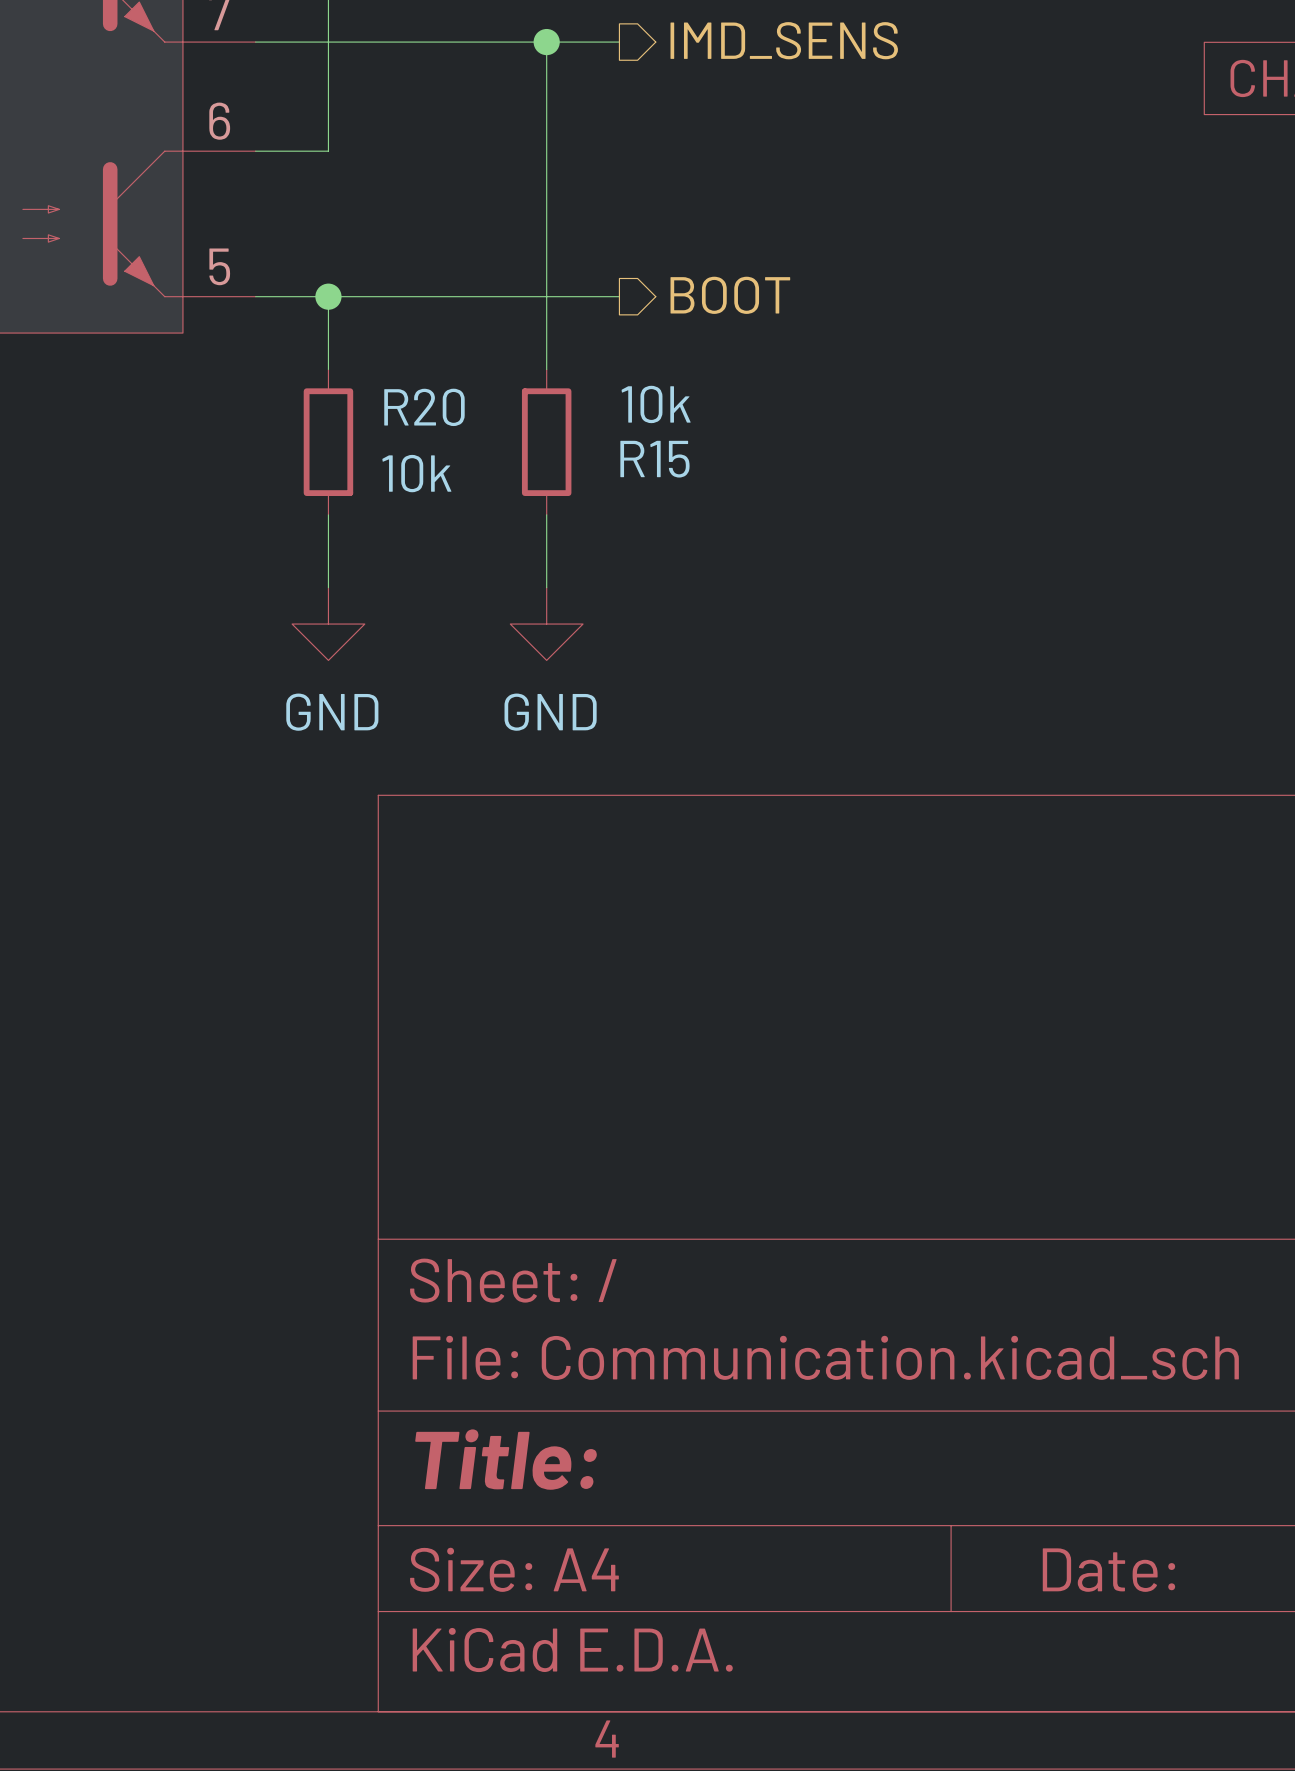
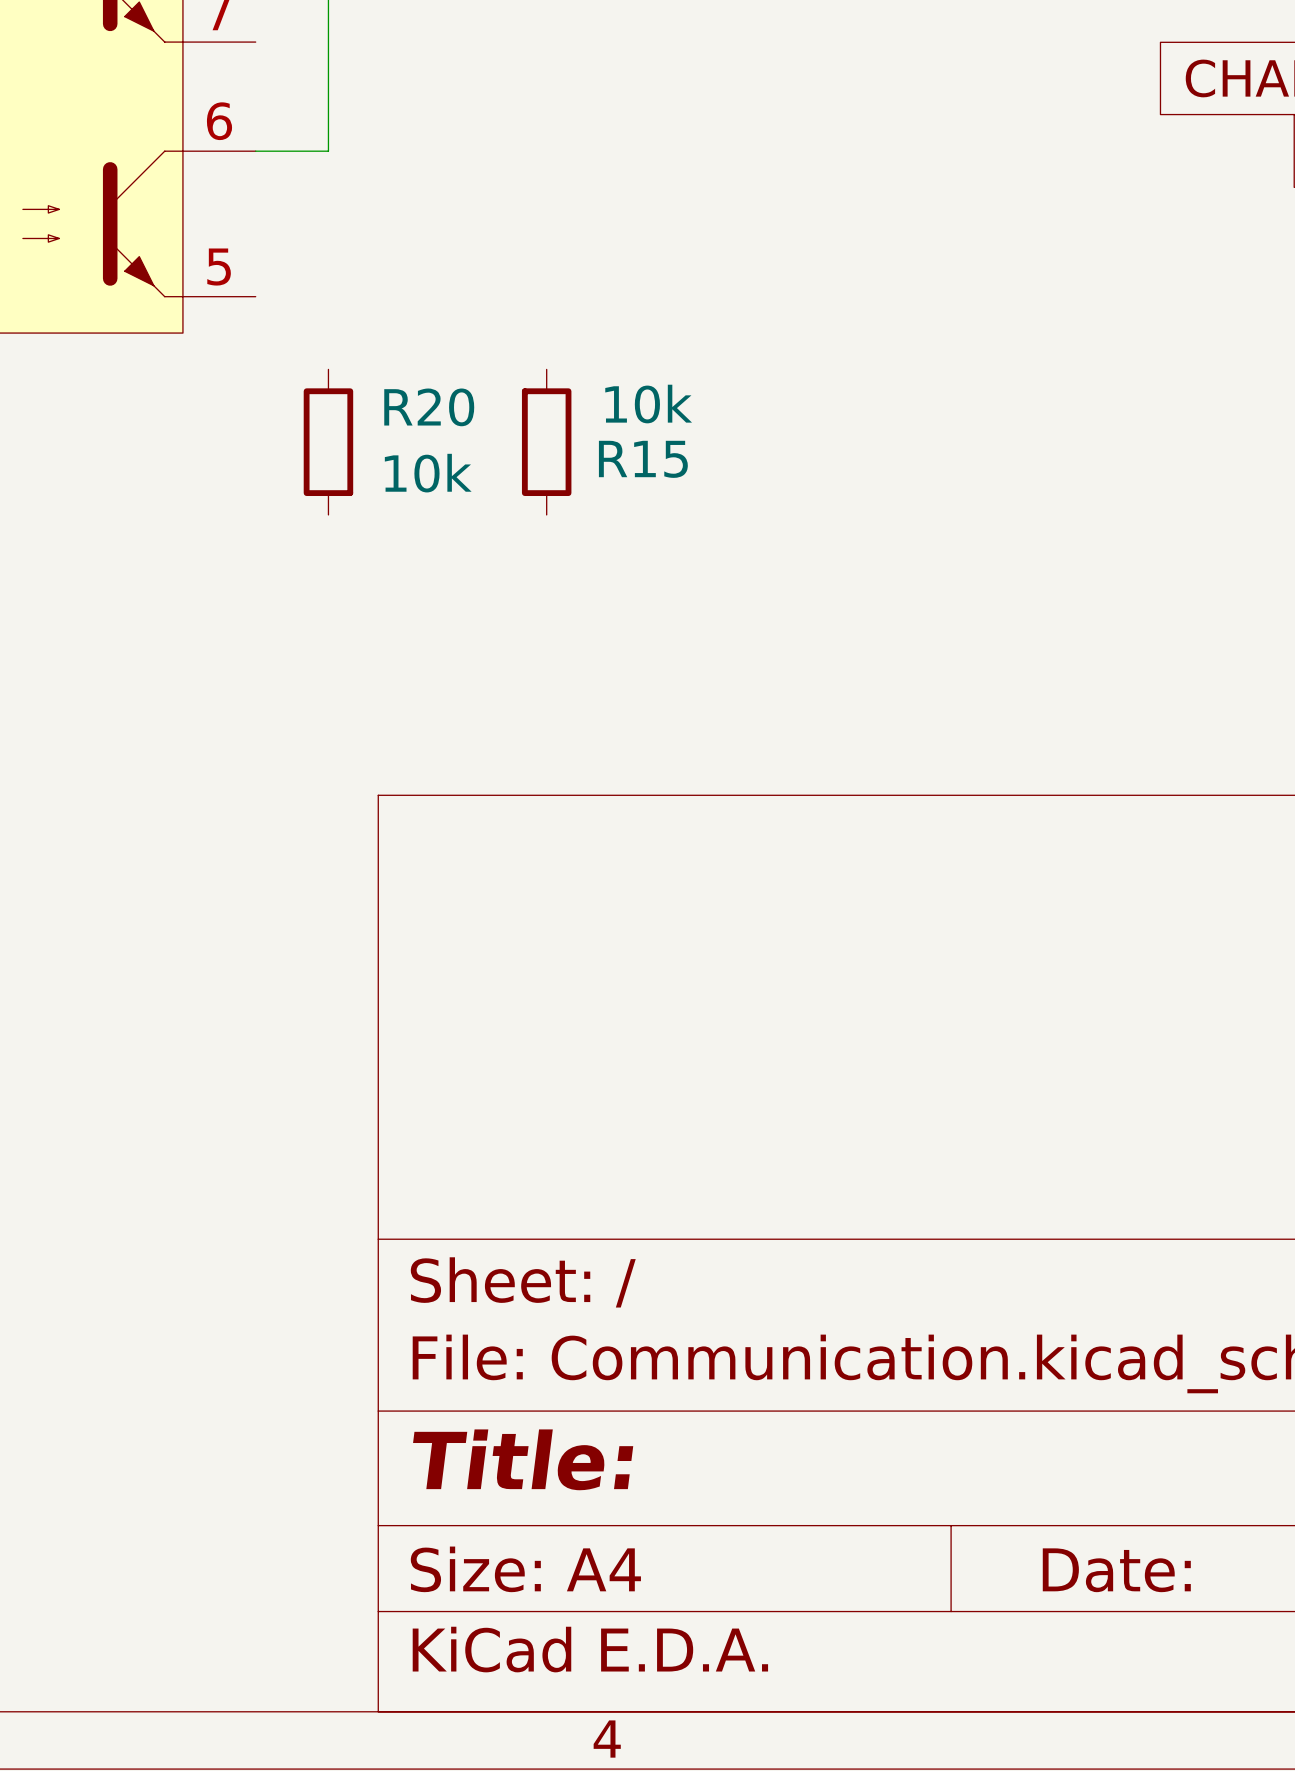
hierarchical label: IMD_SENS (784, 40) -> none
wire: (255, 42) (619, 42) -> none
wire: (546, 42) (546, 369) -> none
junction: (546, 42) -> none
hierarchical label: BOOT (730, 295) -> none
wire: (255, 296) (619, 296) -> none
wire: (328, 296) (328, 369) -> none
junction: (328, 296) -> none
wire: (328, 514) (328, 587) -> none
wire: (546, 514) (546, 587) -> none
power symbol: GND (328, 624) -> none
power symbol: GND (546, 624) -> none

